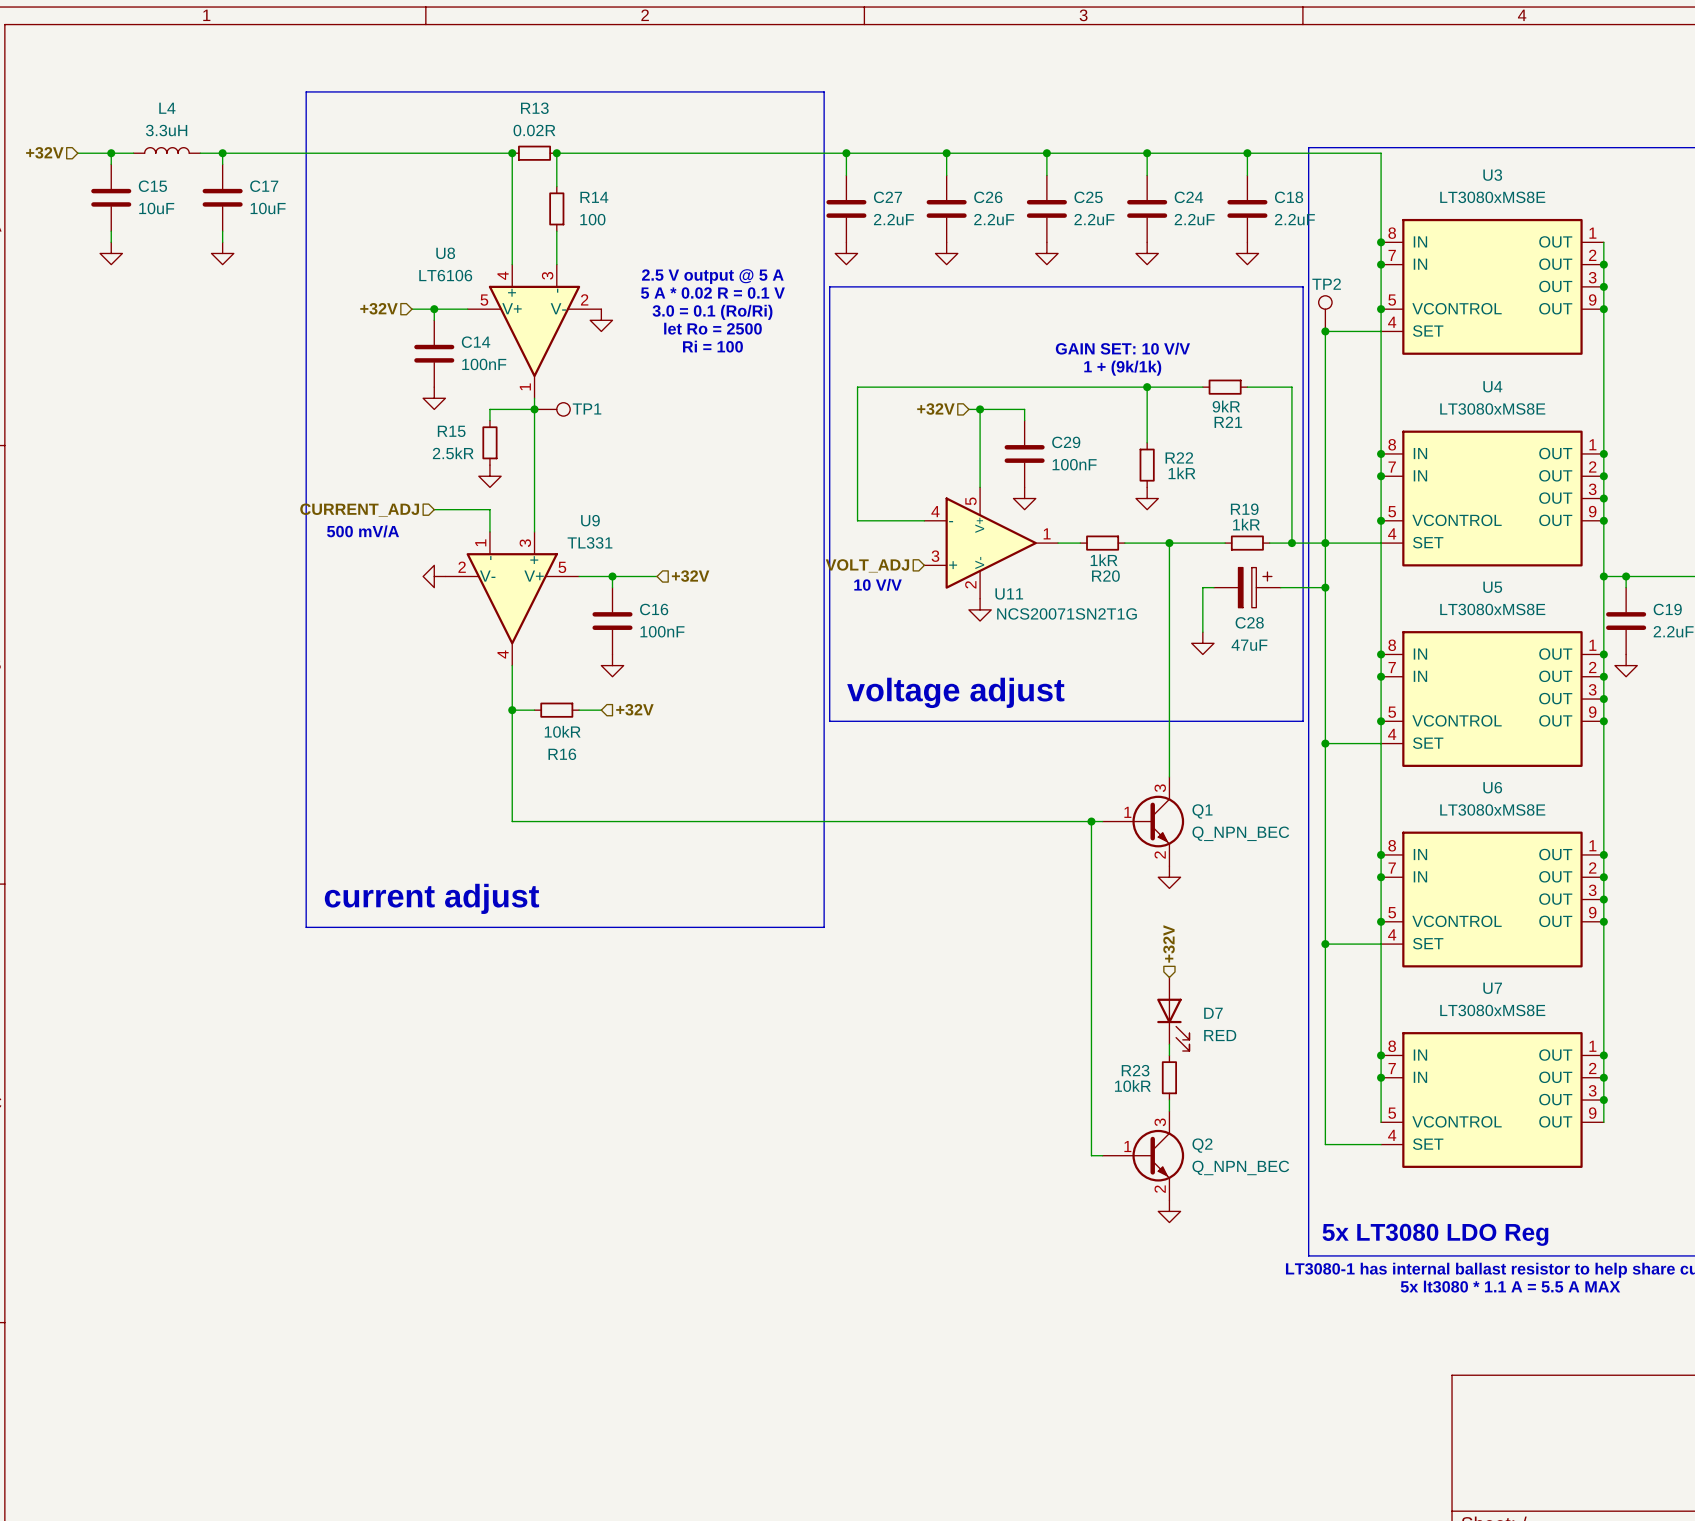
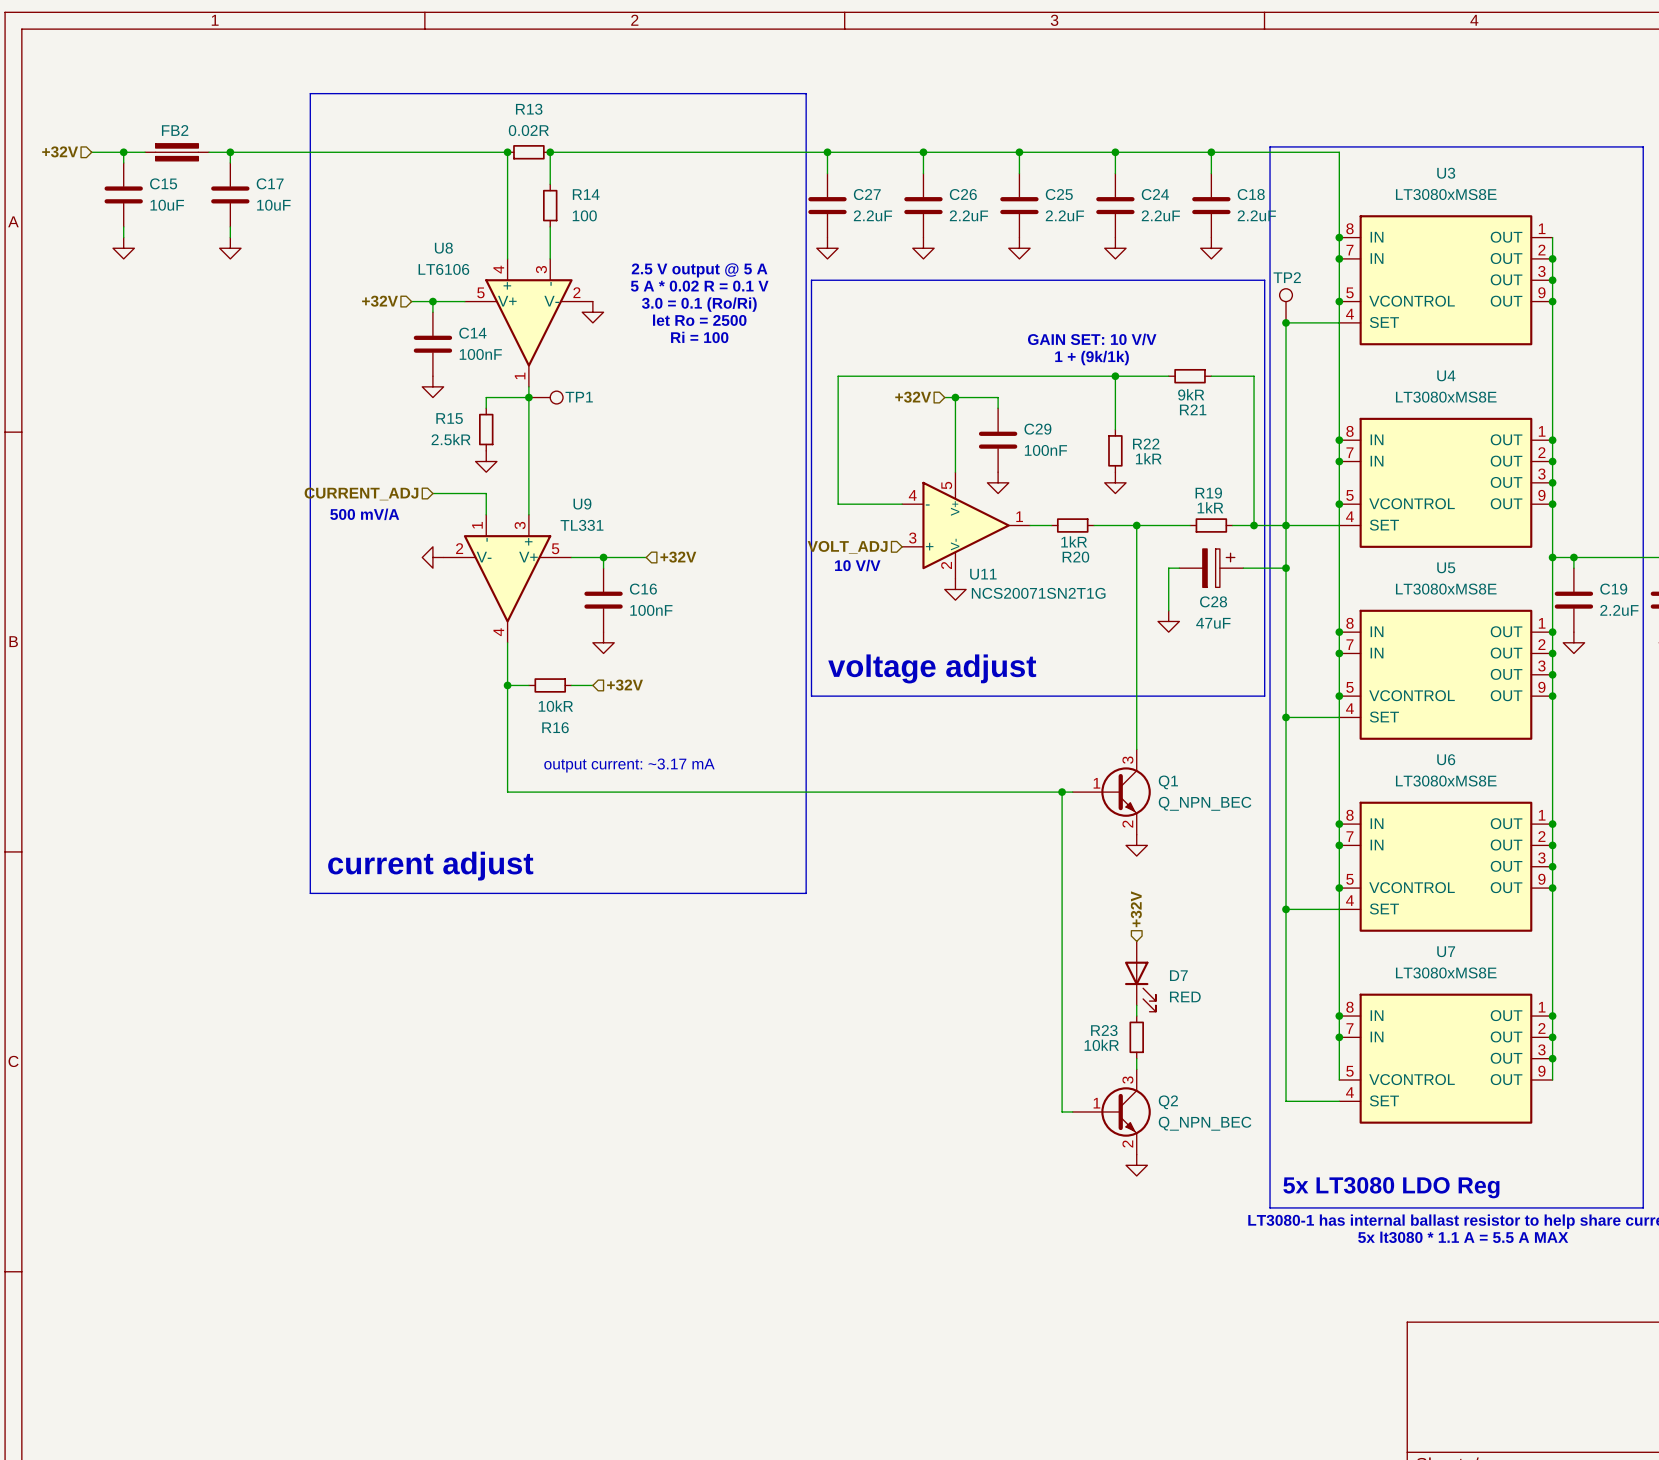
L4: 3.3uH (166, 150) -> none
FB2: none -> (177, 152)
text: none -> output current: ~3.17 mA (629, 765)

